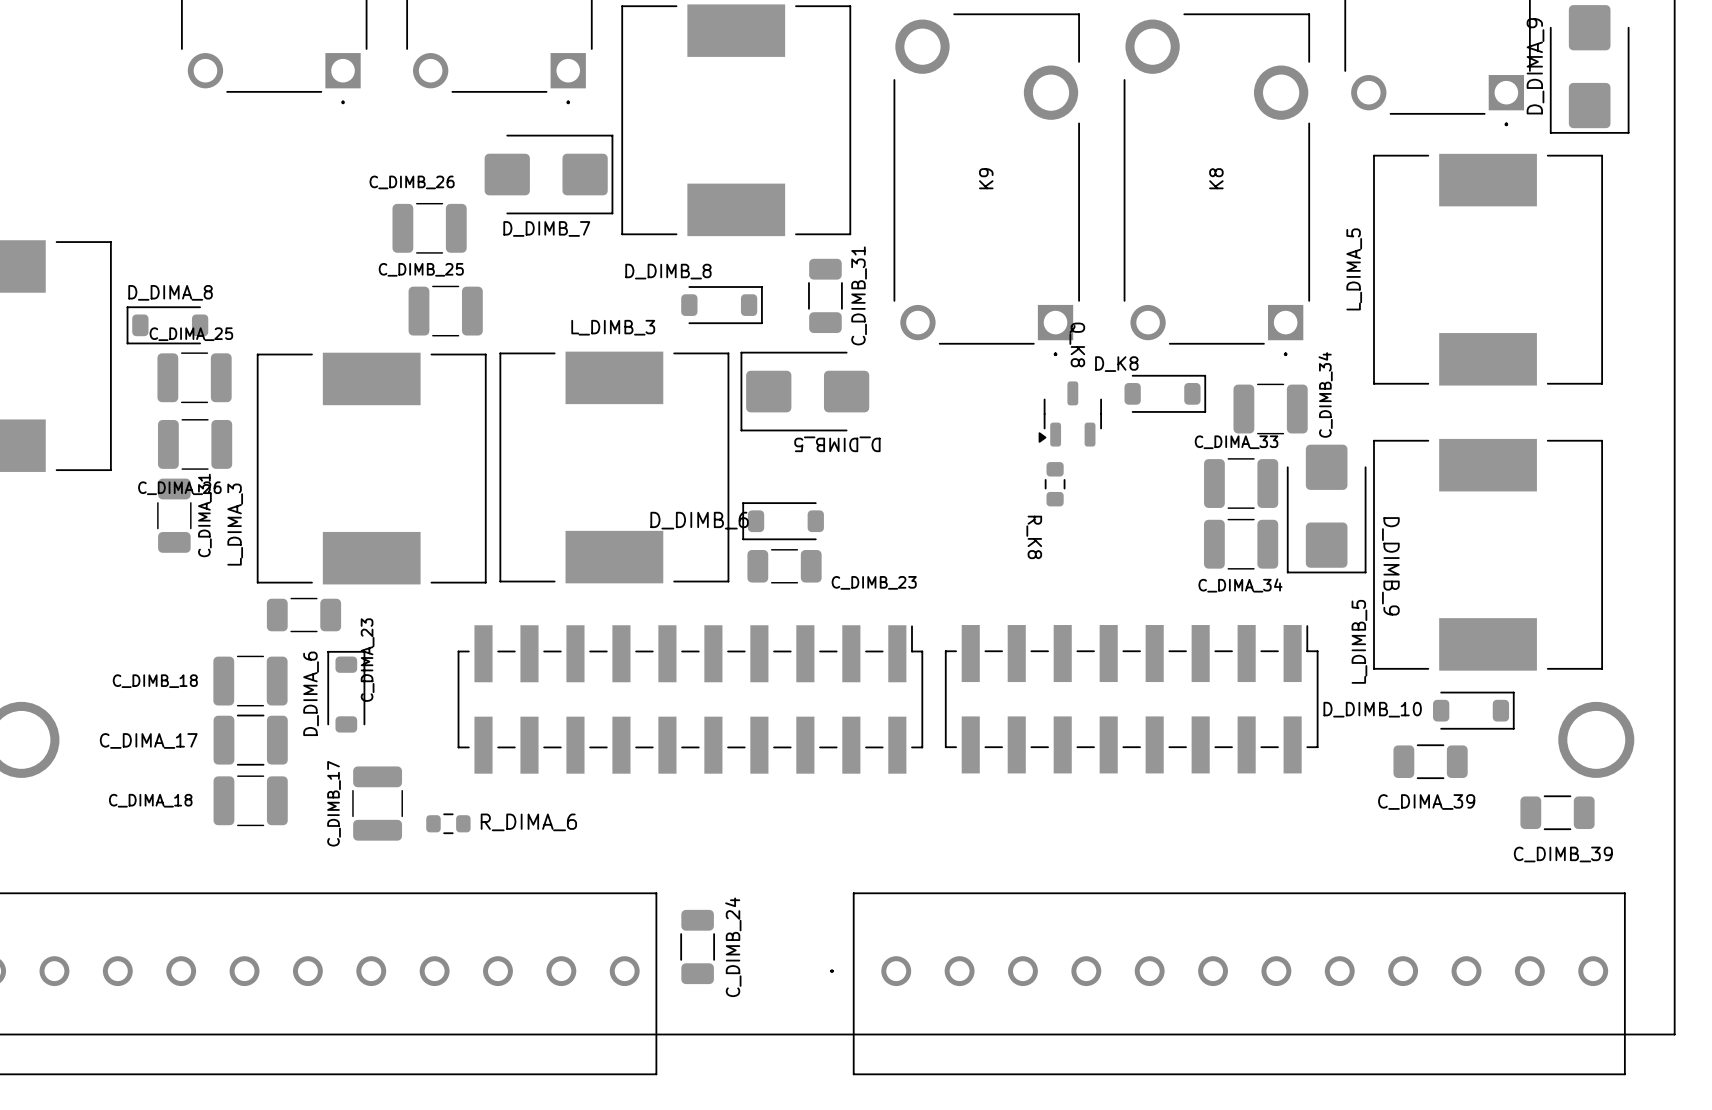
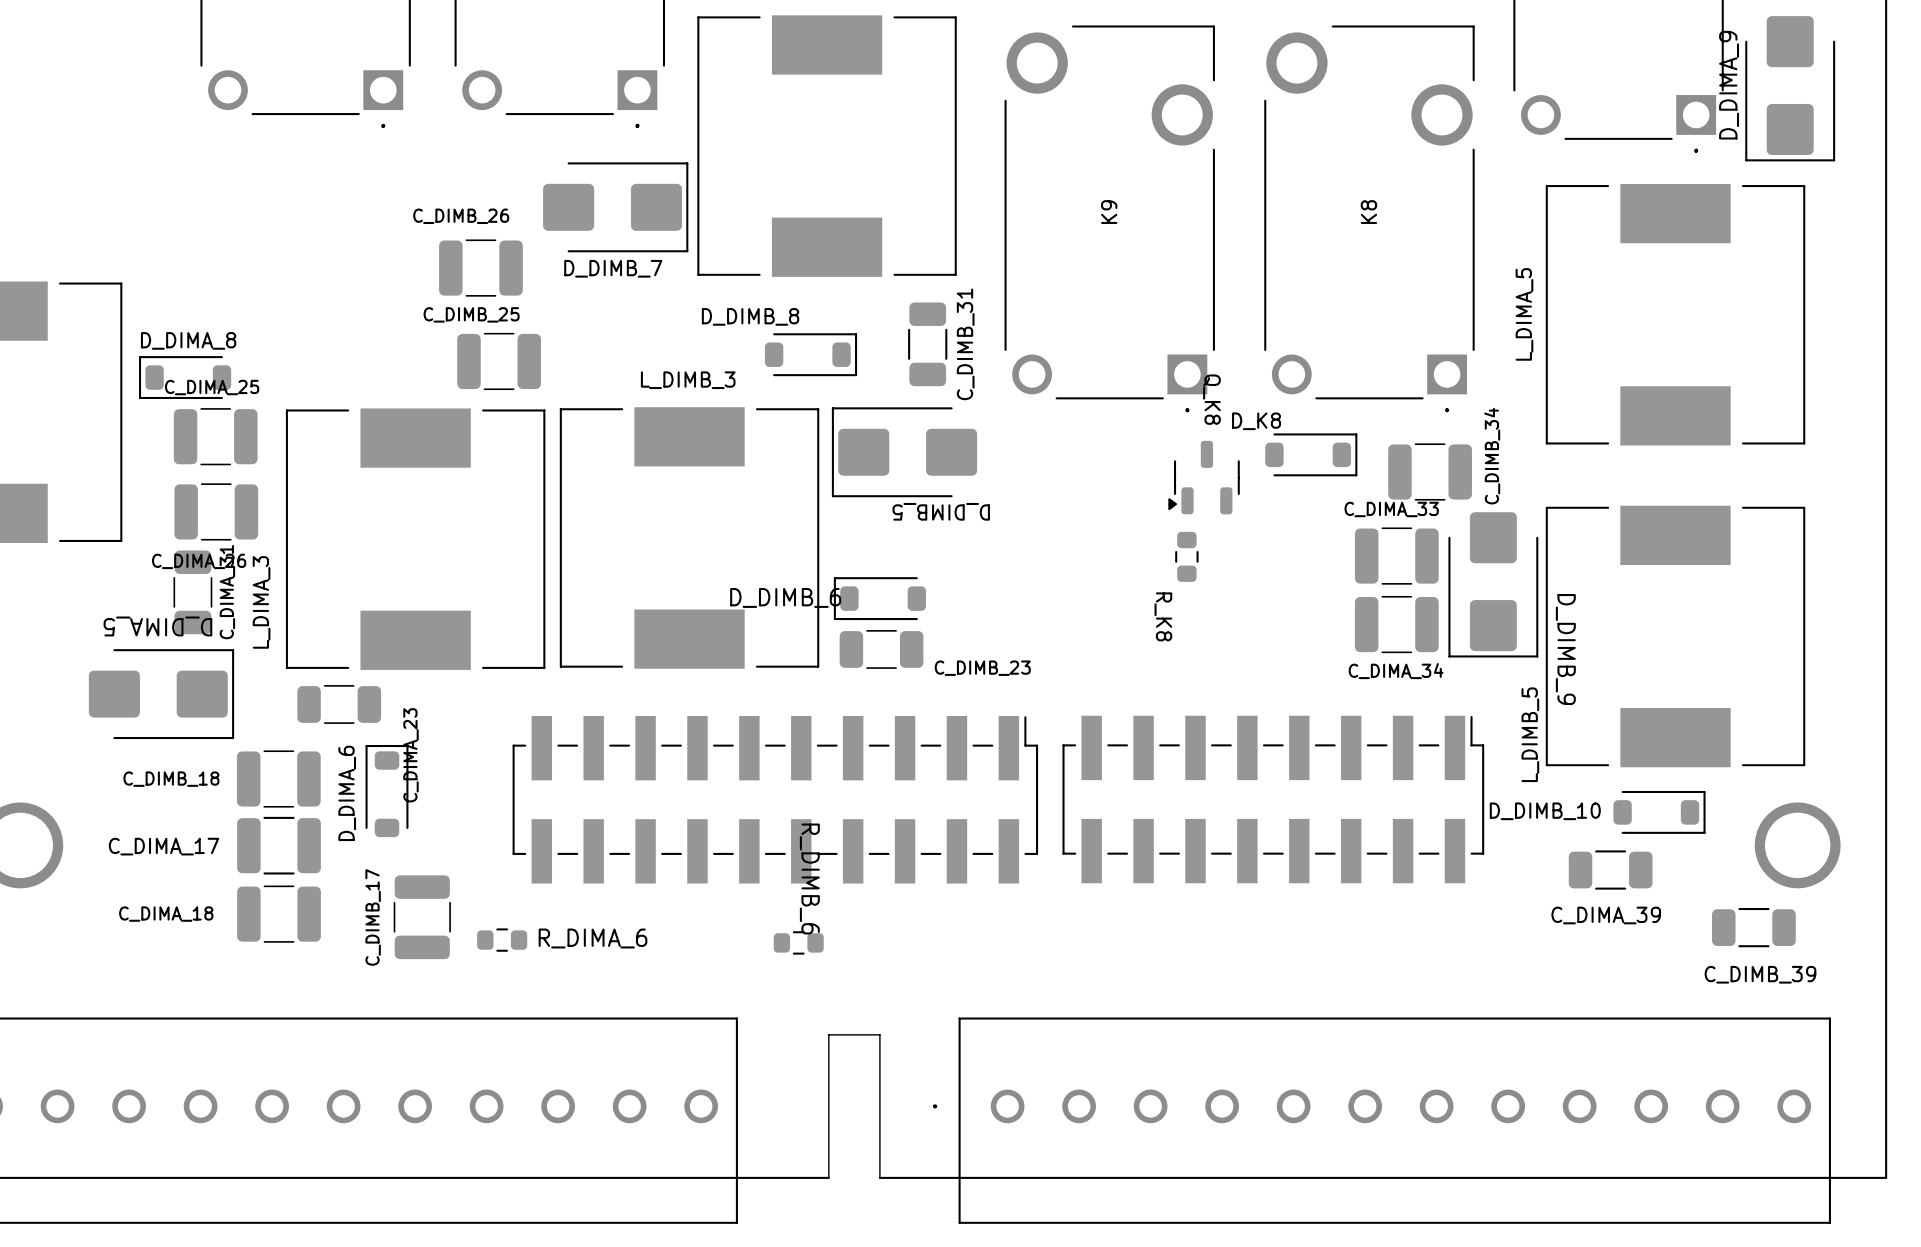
D_DIMA_5: none -> (161, 694)
R_DIMB_6: none -> (798, 942)
C_DIMB_24: (697, 946) -> none
board edge: (737, 1034) (783, 1034) -> (828, 1177) (828, 1034) (879, 1034) (879, 1177)

